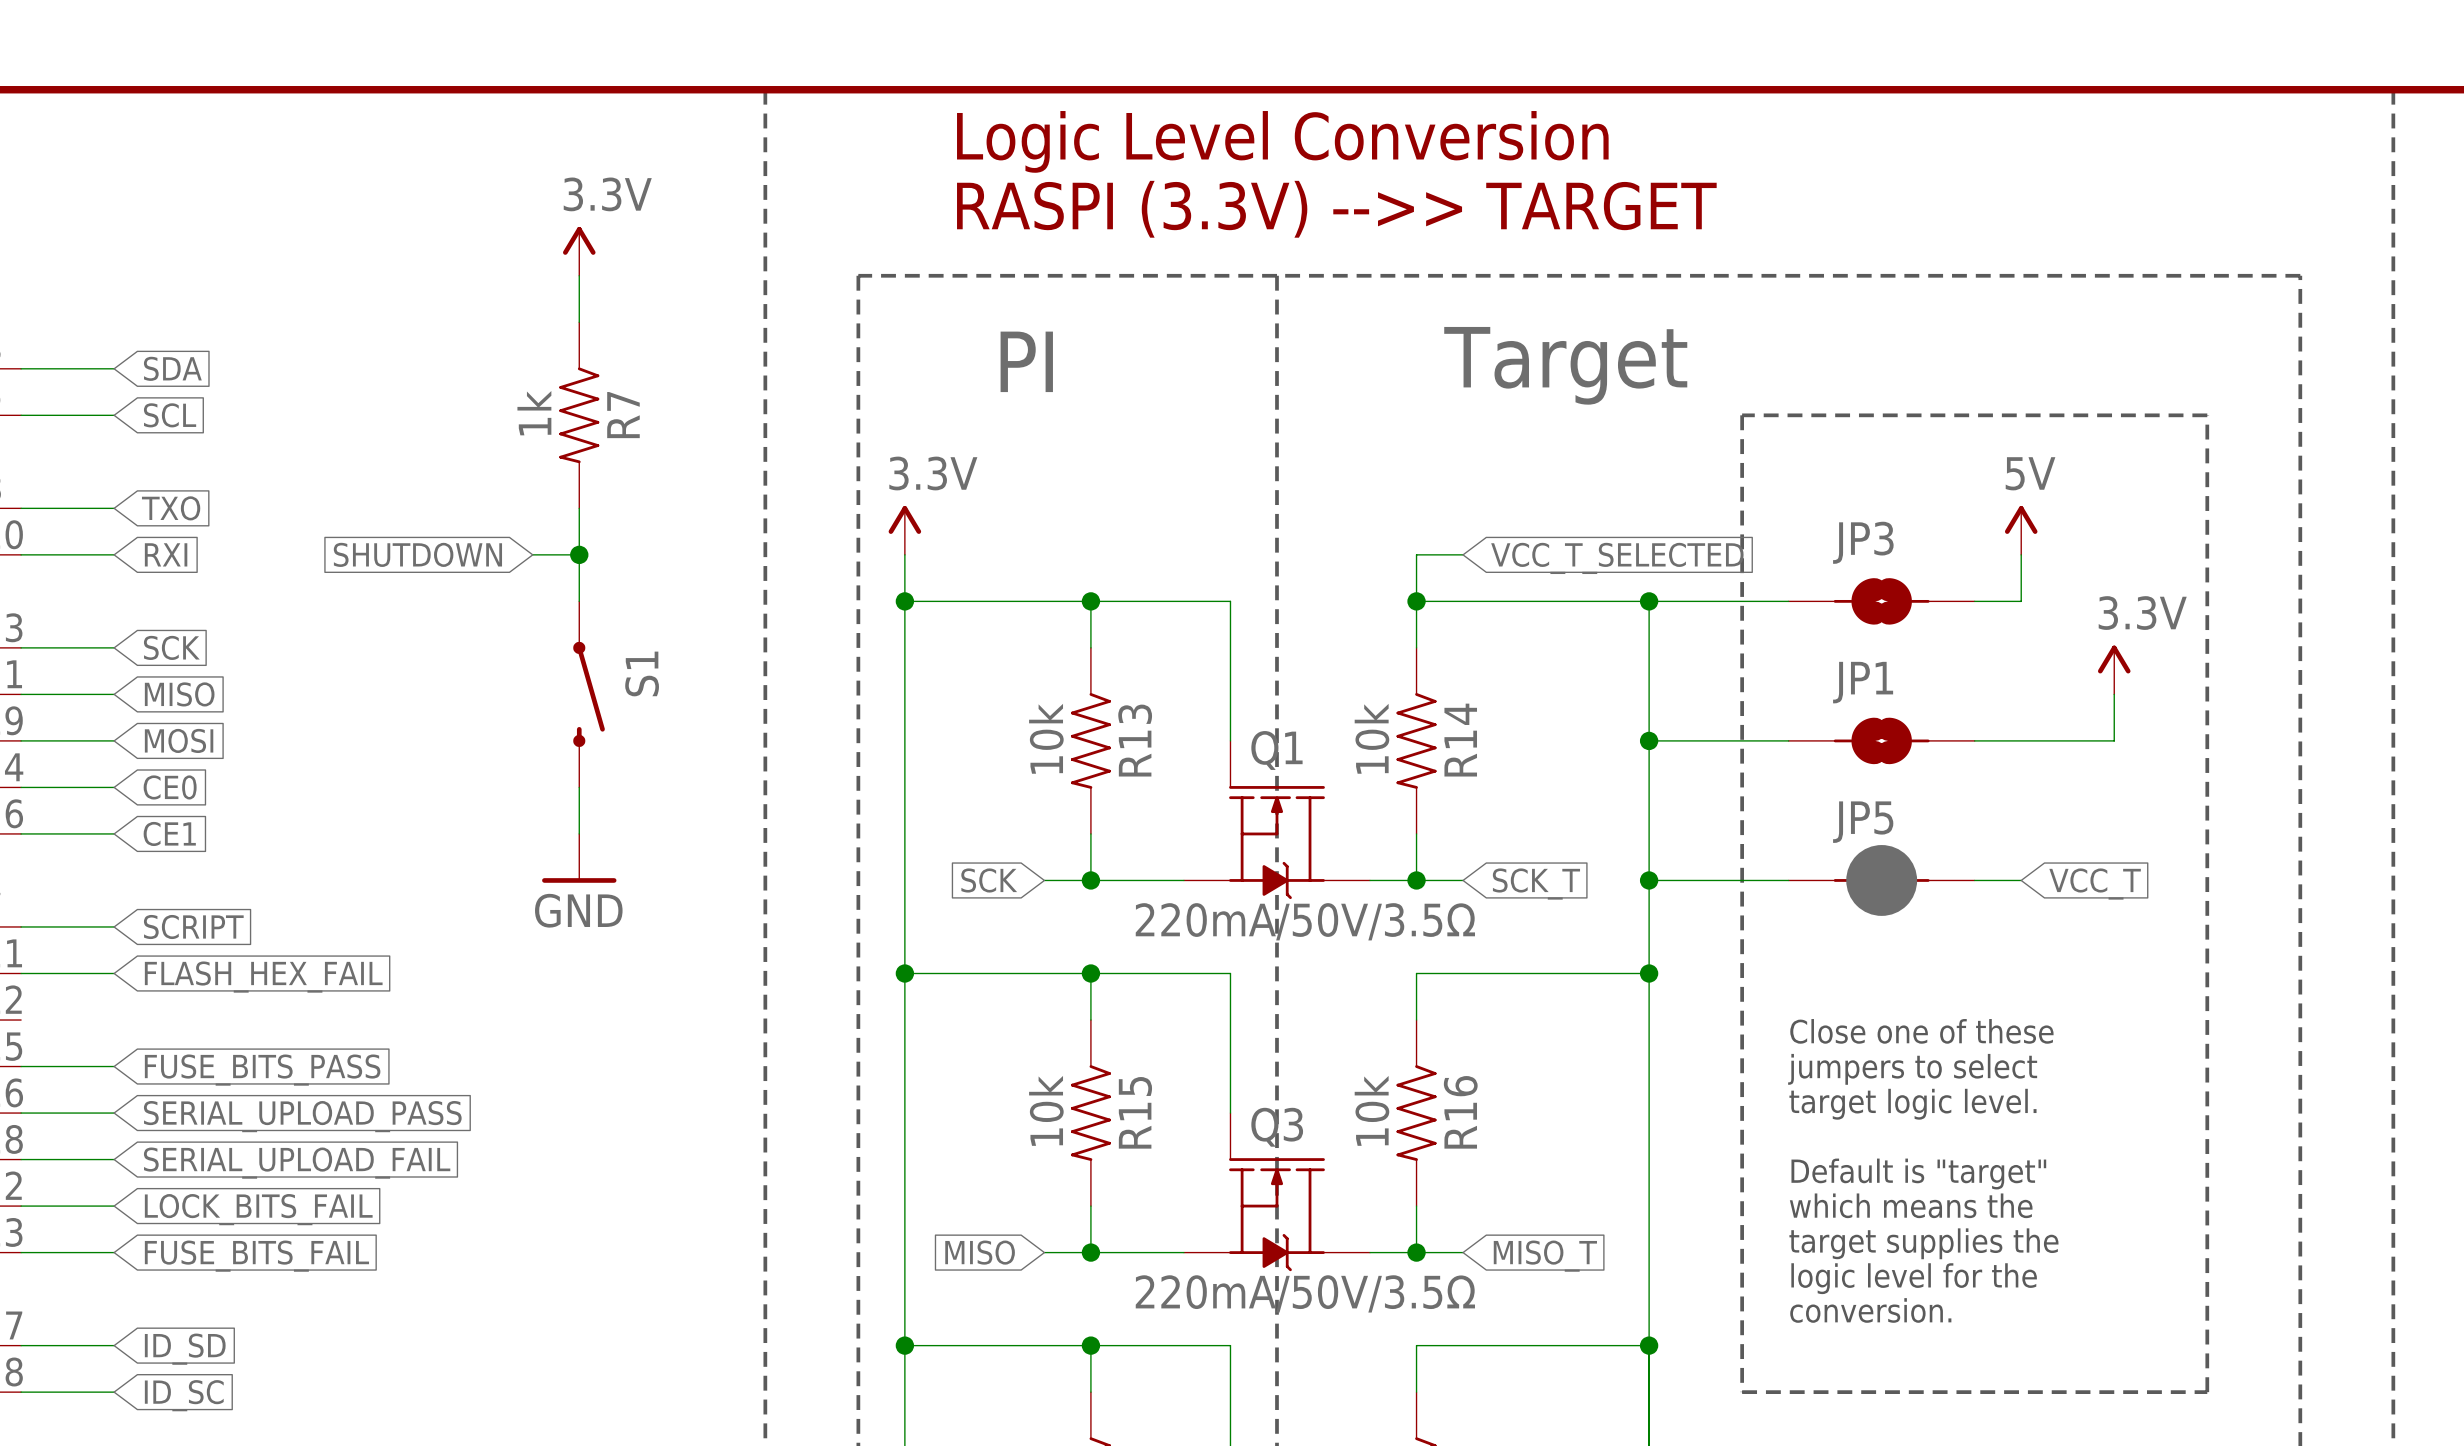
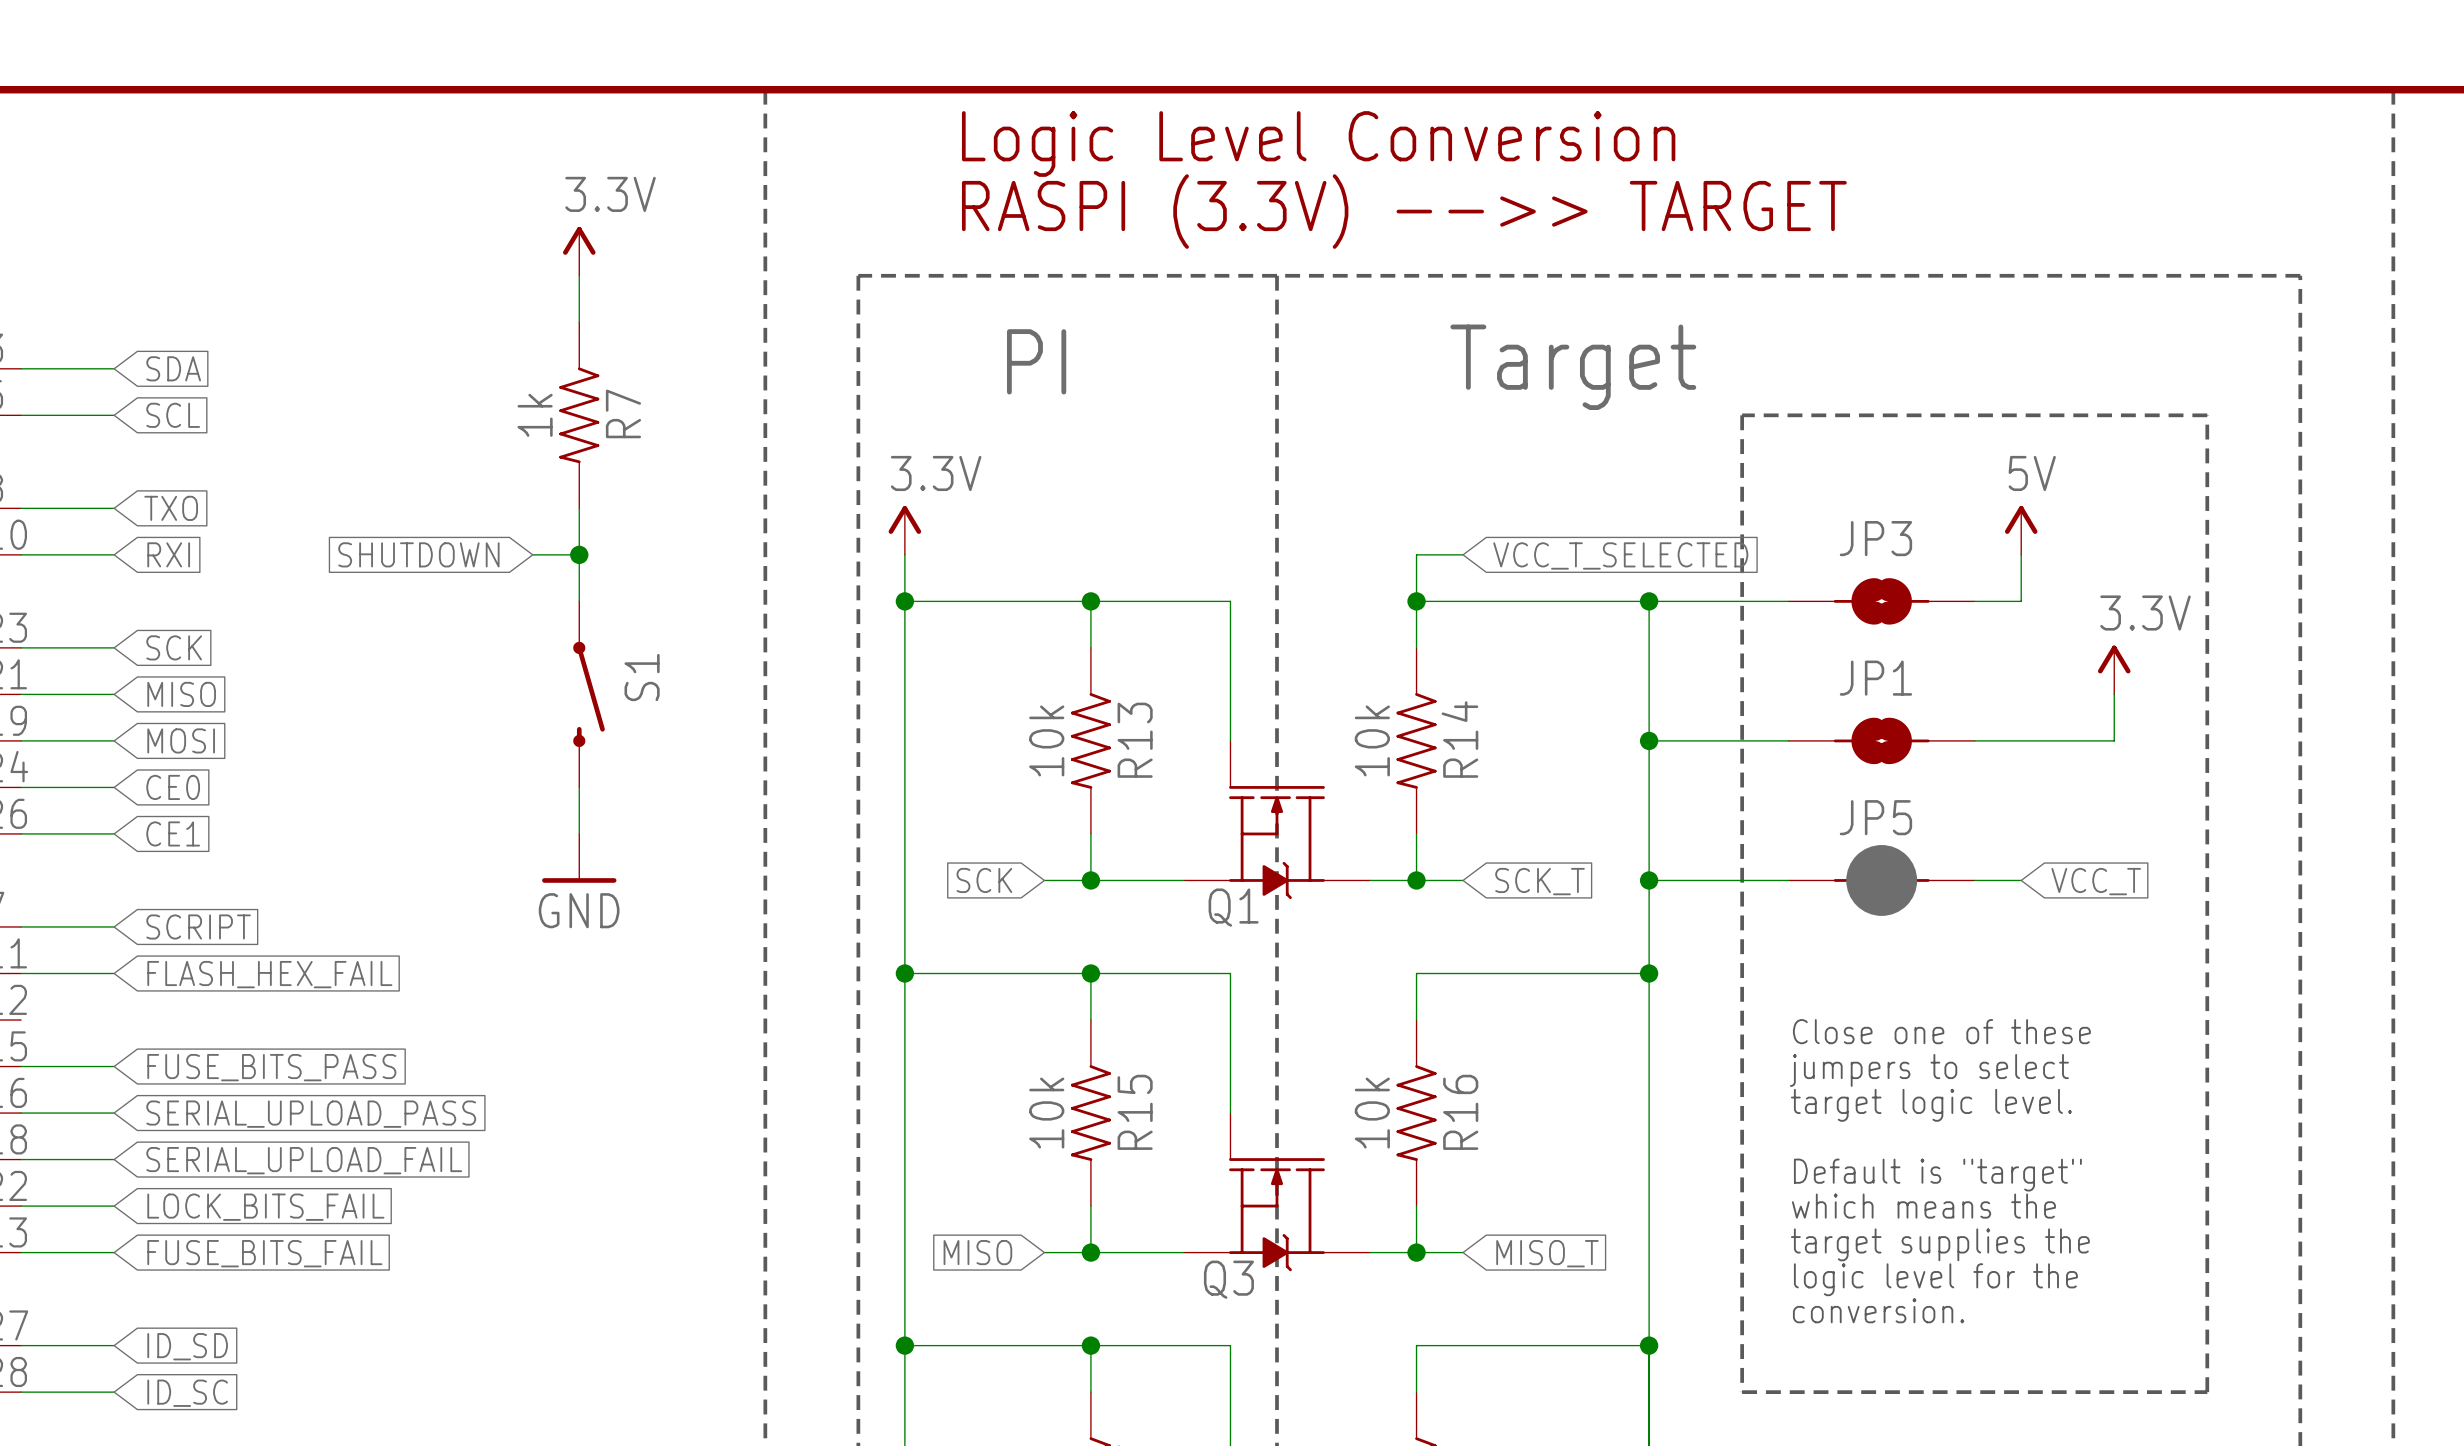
Q1 name position: Q1 (1276, 750) -> Q1 (1233, 907)
Q1 value: 220mA/50V/3.5Ω (1305, 921) -> none
Q3 name position: Q3 (1277, 1127) -> Q3 (1228, 1279)
Q3 value: 220mA/50V/3.5Ω (1305, 1293) -> none

